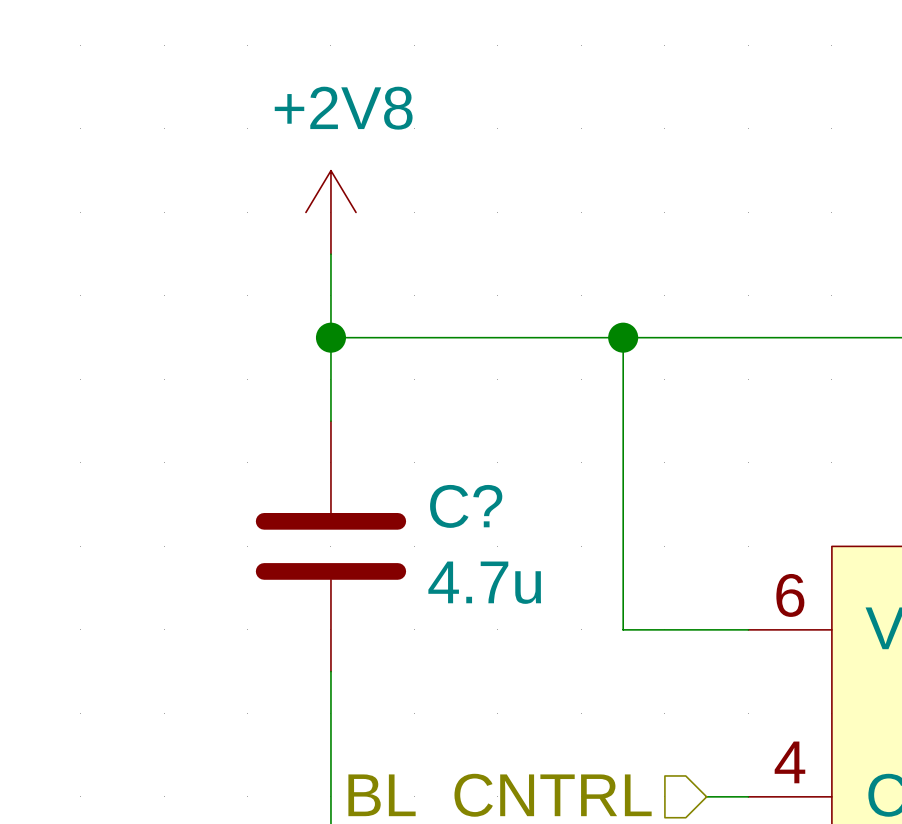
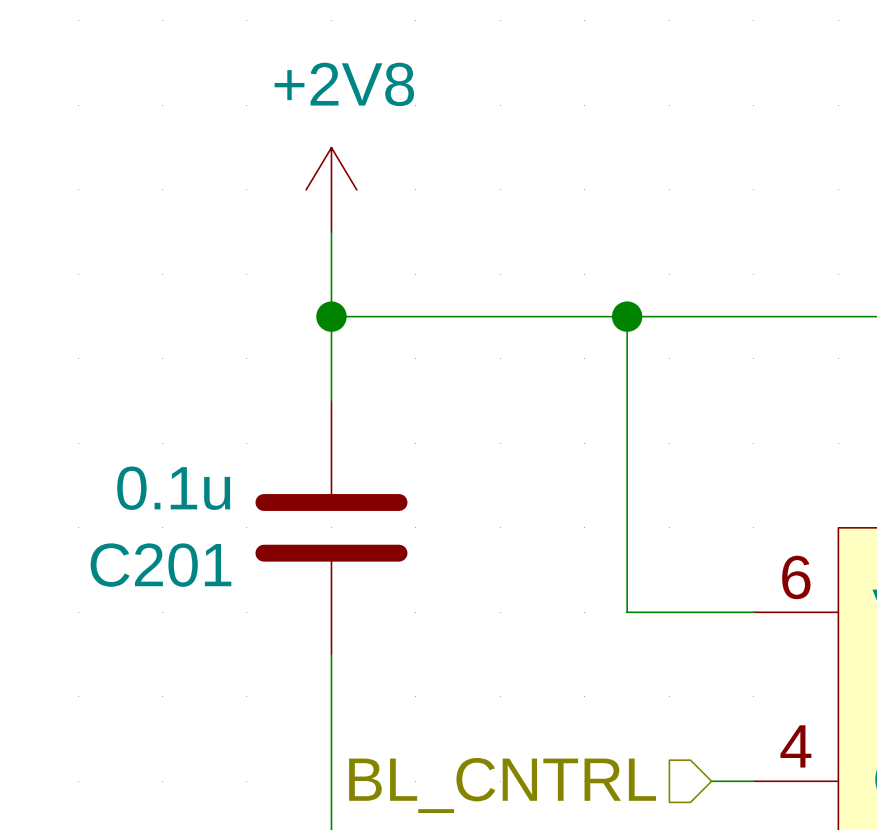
C? name: C? (466, 506) -> C201 (160, 565)
C? value: 4.7u (484, 582) -> 0.1u (173, 488)

